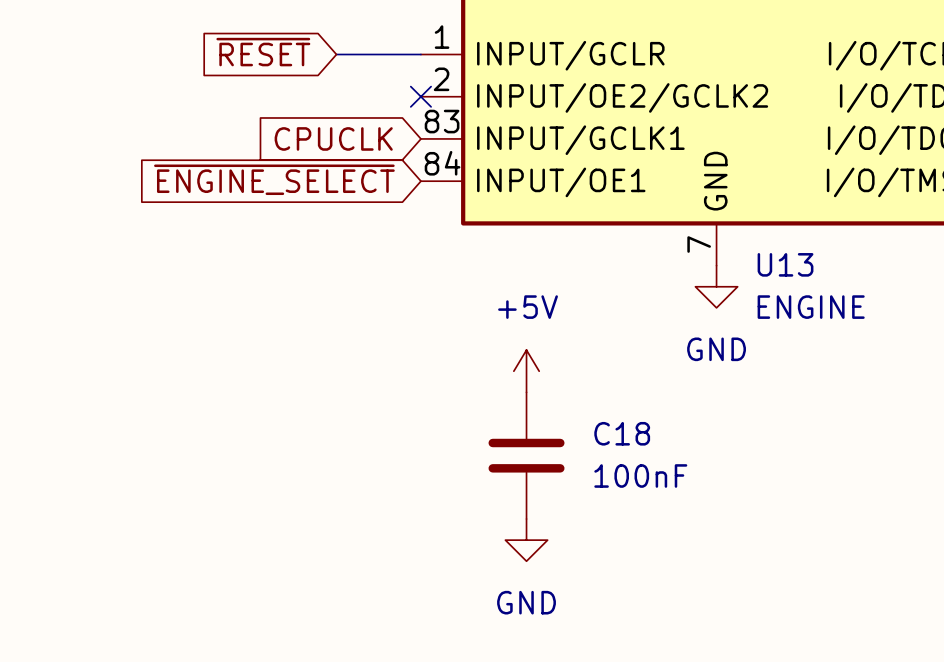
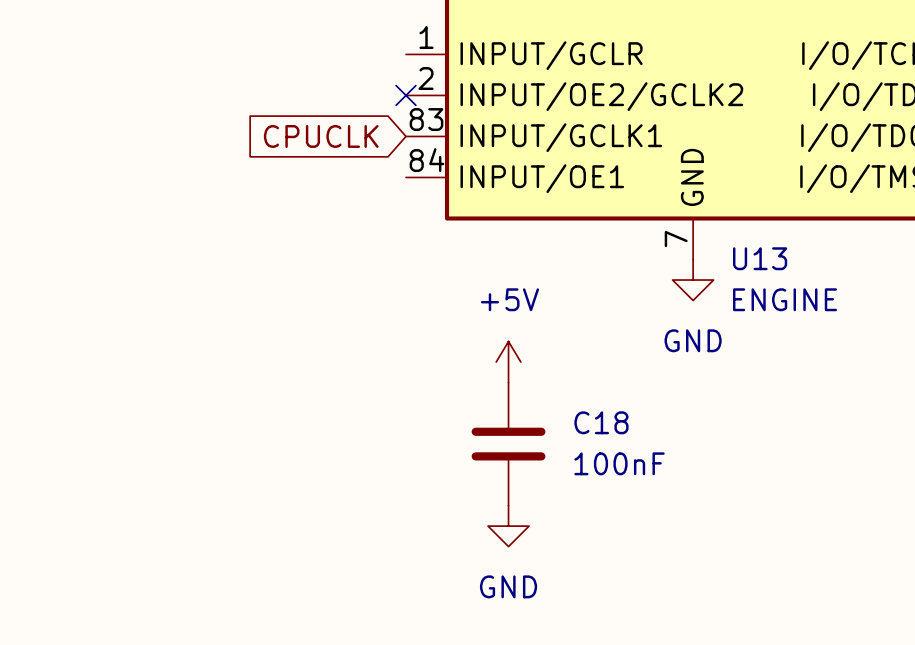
global label: ~{RESET} (263, 52) -> none
wire: (336, 54) (420, 54) -> none
global label: ~{ENGINE_SELECT} (274, 179) -> none

